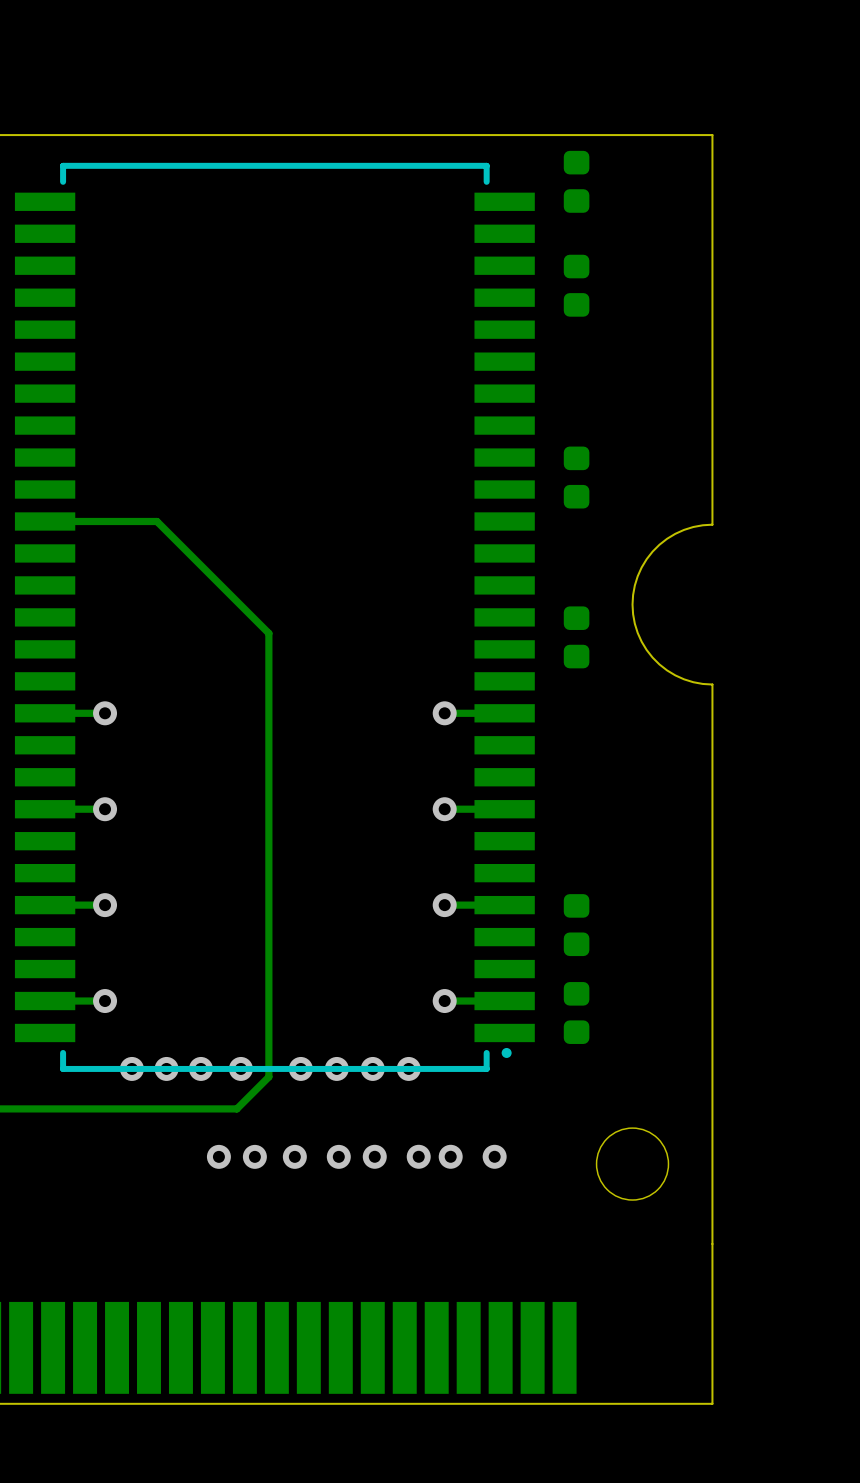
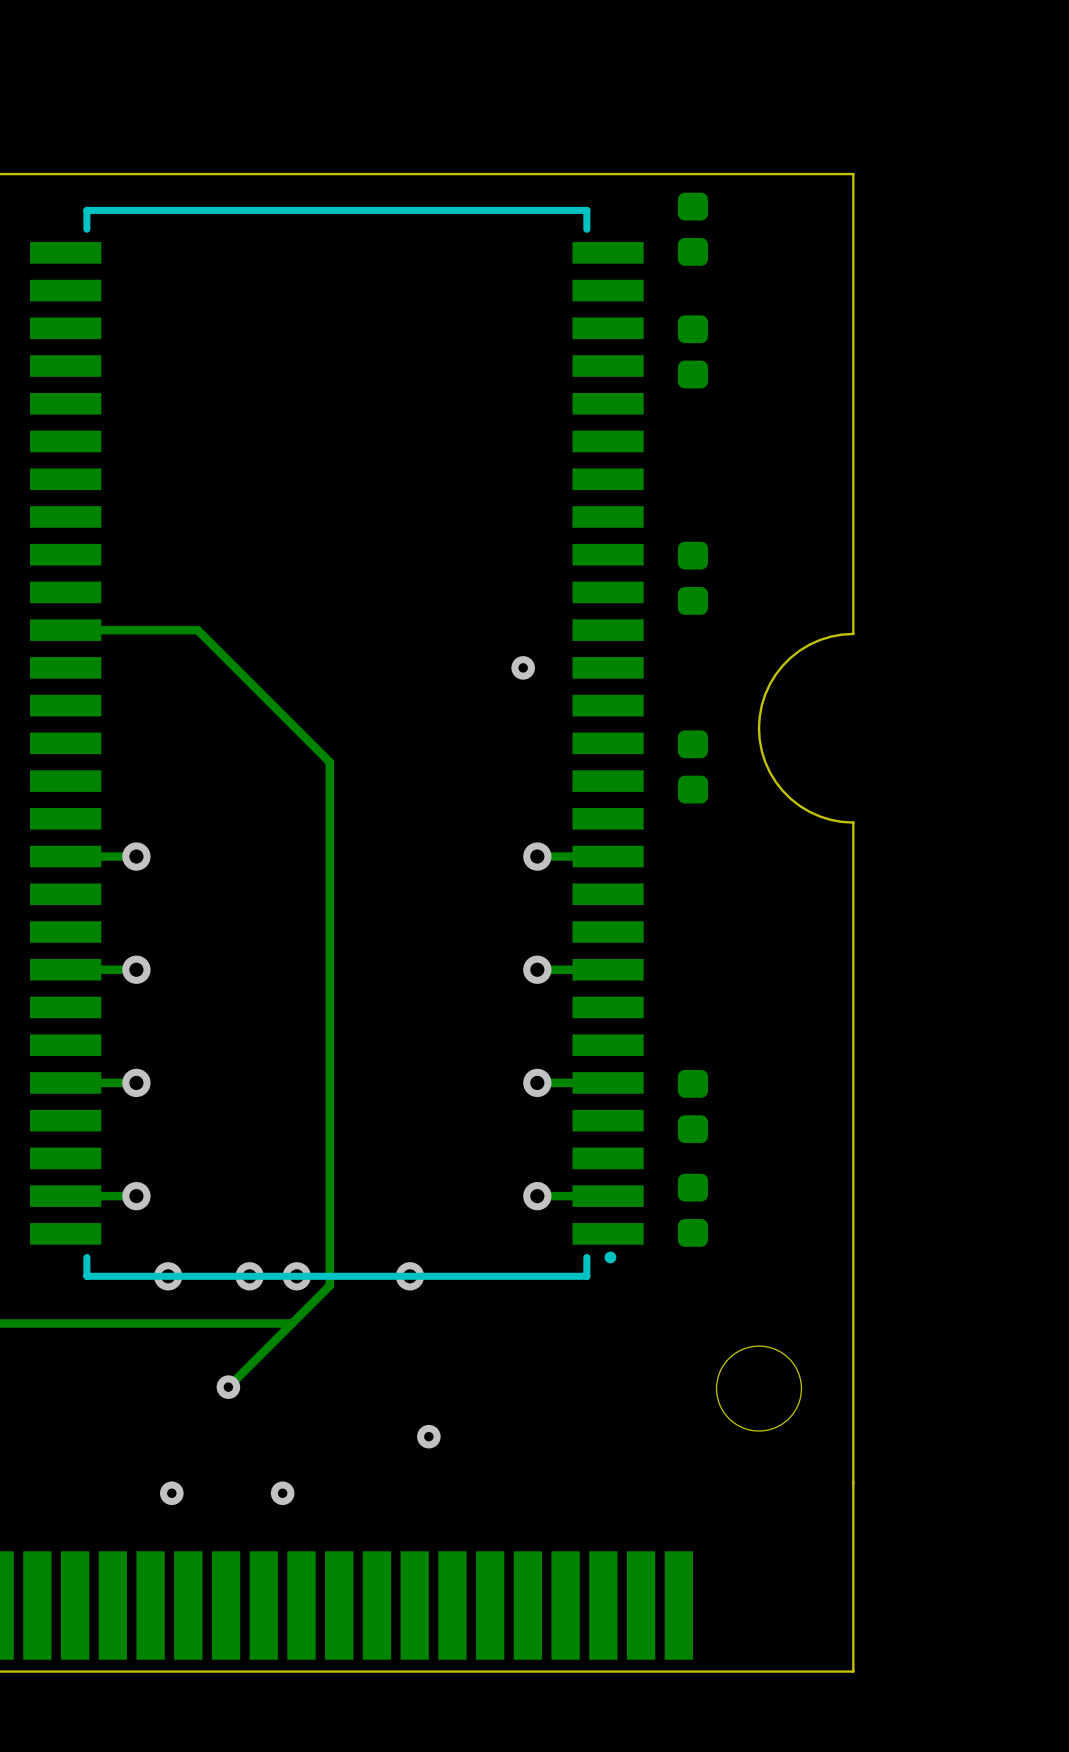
via: none -> (523, 667)
via: (166, 1068) -> none
via: (300, 1068) -> none
via: (372, 1068) -> none
via: (408, 1068) -> none
track: none -> (292, 1323) (228, 1387)
via: (218, 1156) -> none
via: (254, 1156) -> none
via: (294, 1156) -> none
via: (338, 1156) -> none
via: (374, 1156) -> none
via: (418, 1156) -> none
via: (450, 1156) -> none
via: (494, 1156) -> none
via: none -> (228, 1387)
via: none -> (428, 1436)
via: none -> (171, 1493)
via: none -> (282, 1493)

